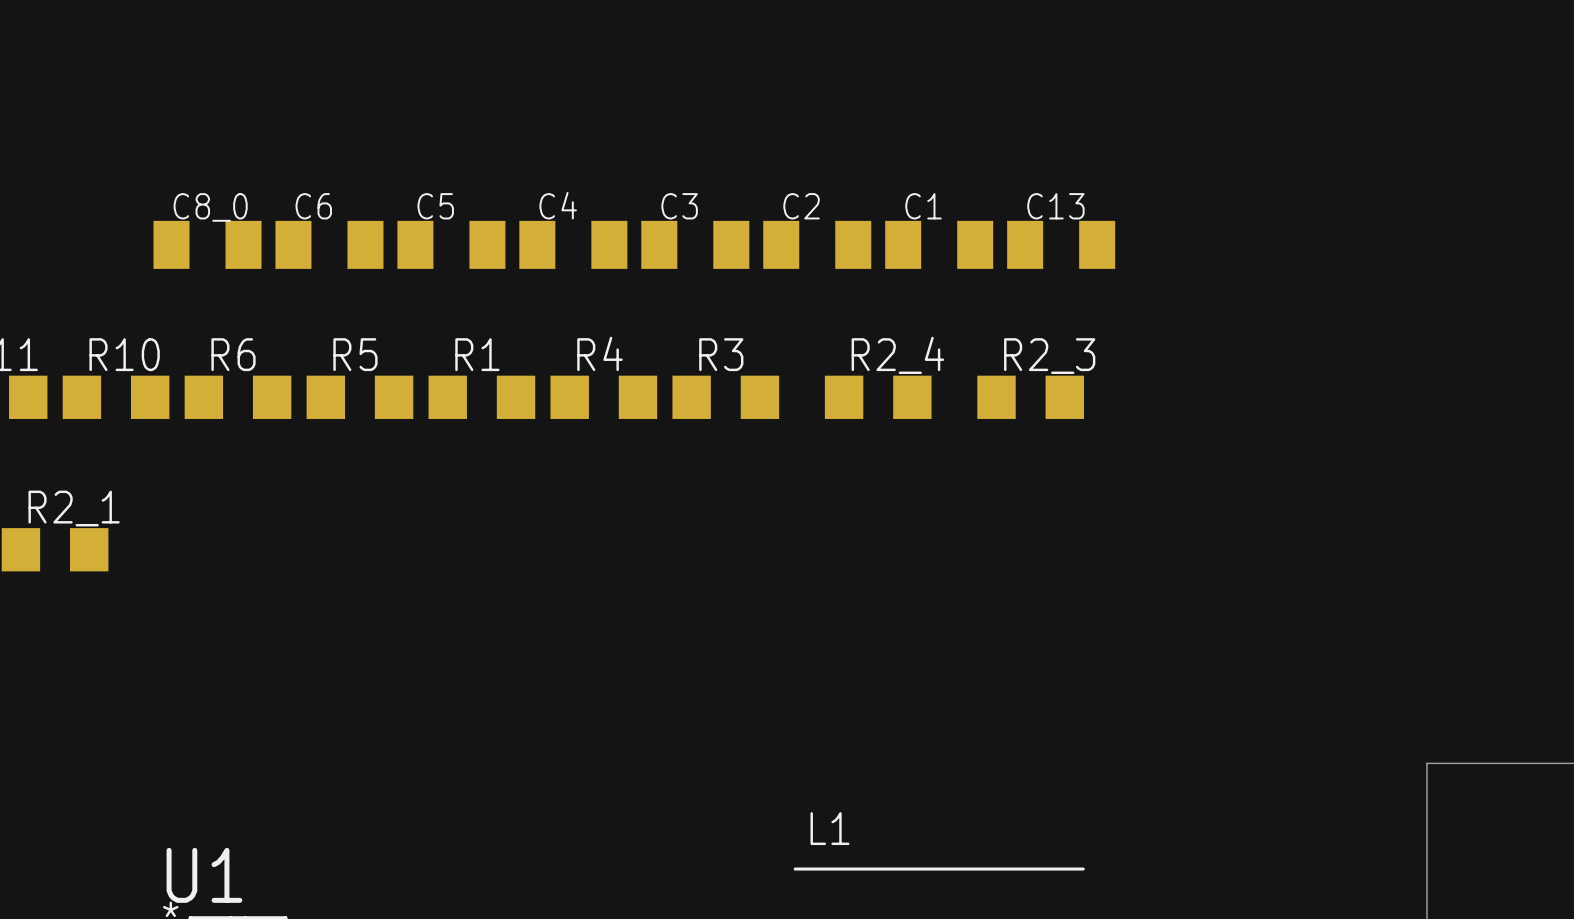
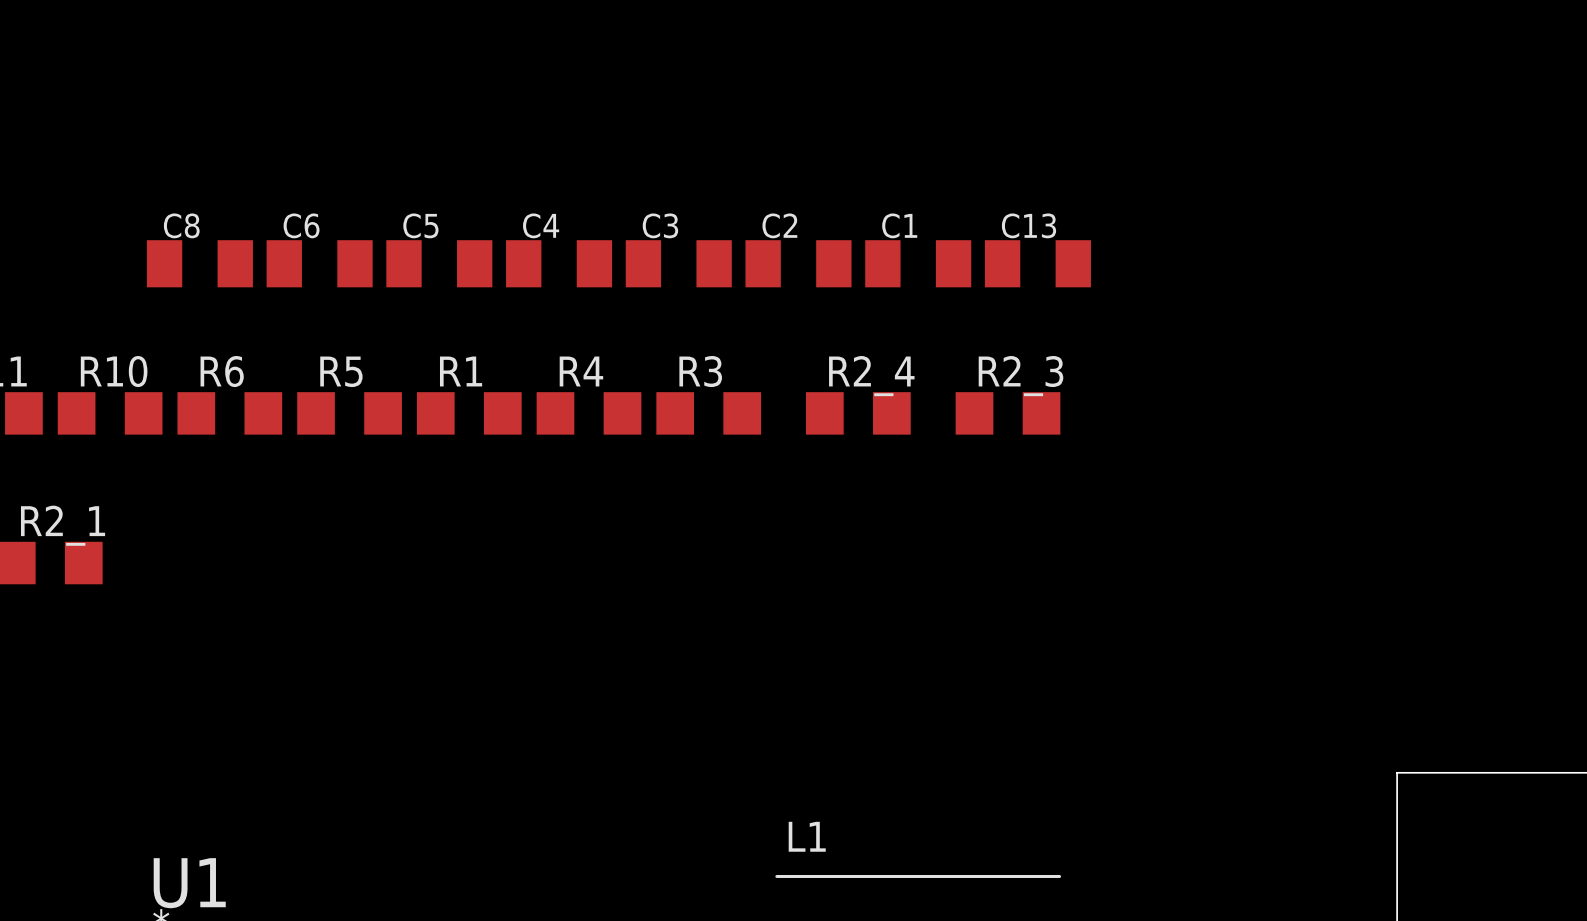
C8_0 name: C8_0 (210, 207) -> C8 (181, 225)

